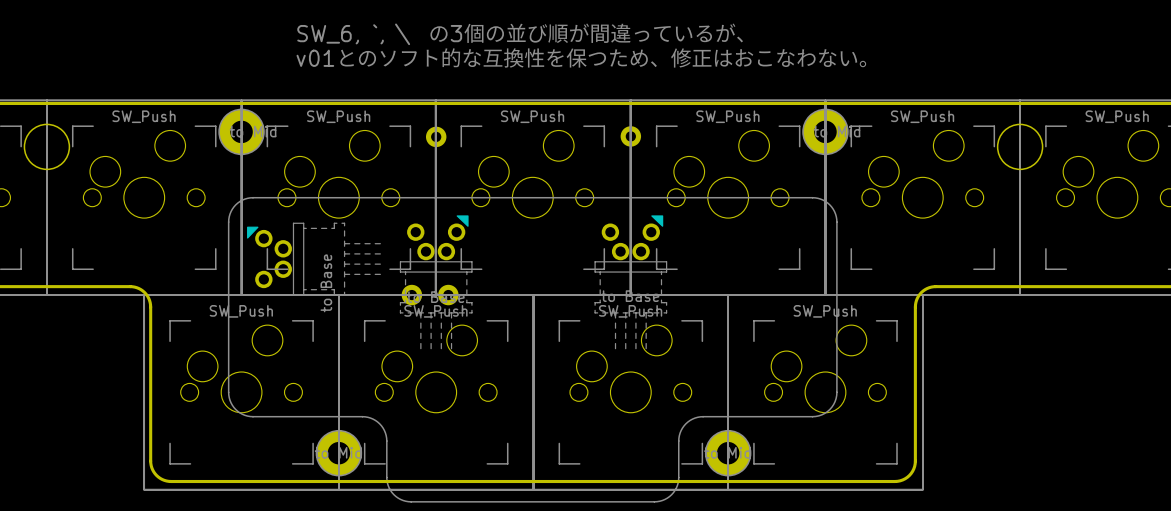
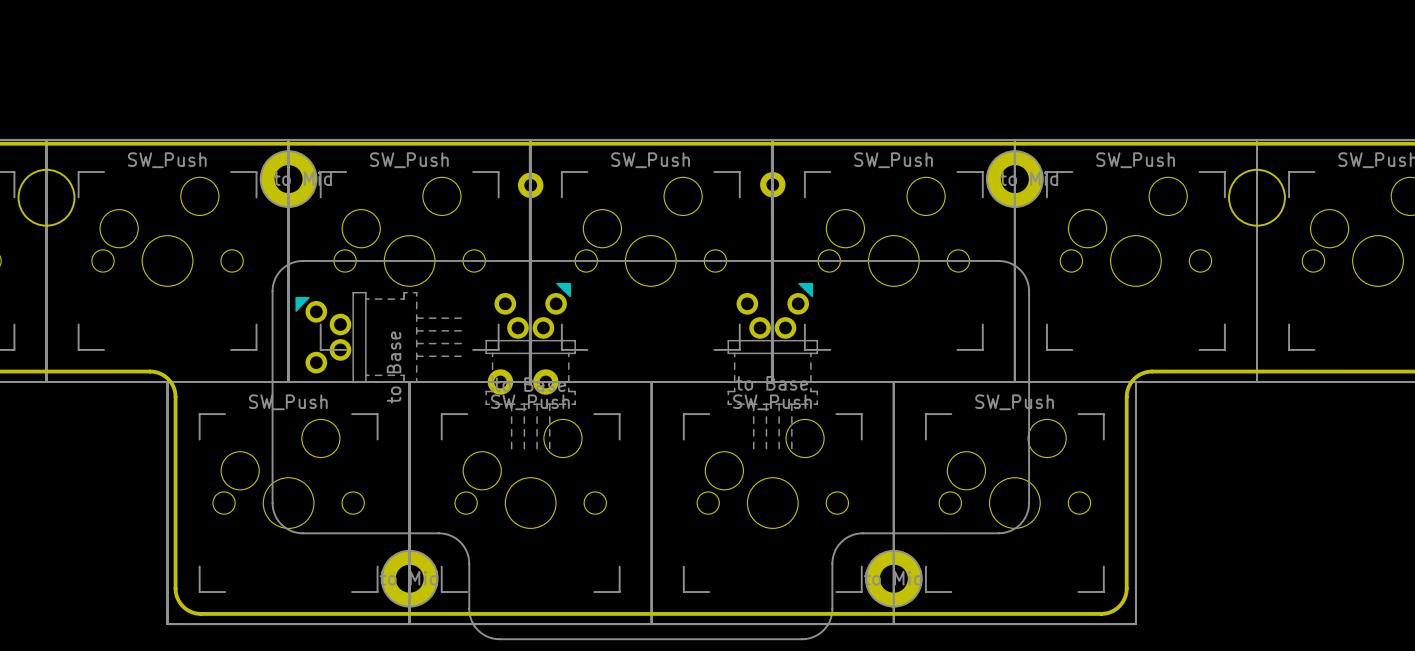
text: SW_6, `, \ の3個の並び順が間違っているが、 (520, 33) -> none
text: v01とのソフト的な互換性を保つため、修正はおこなわない。 (581, 57) -> none

